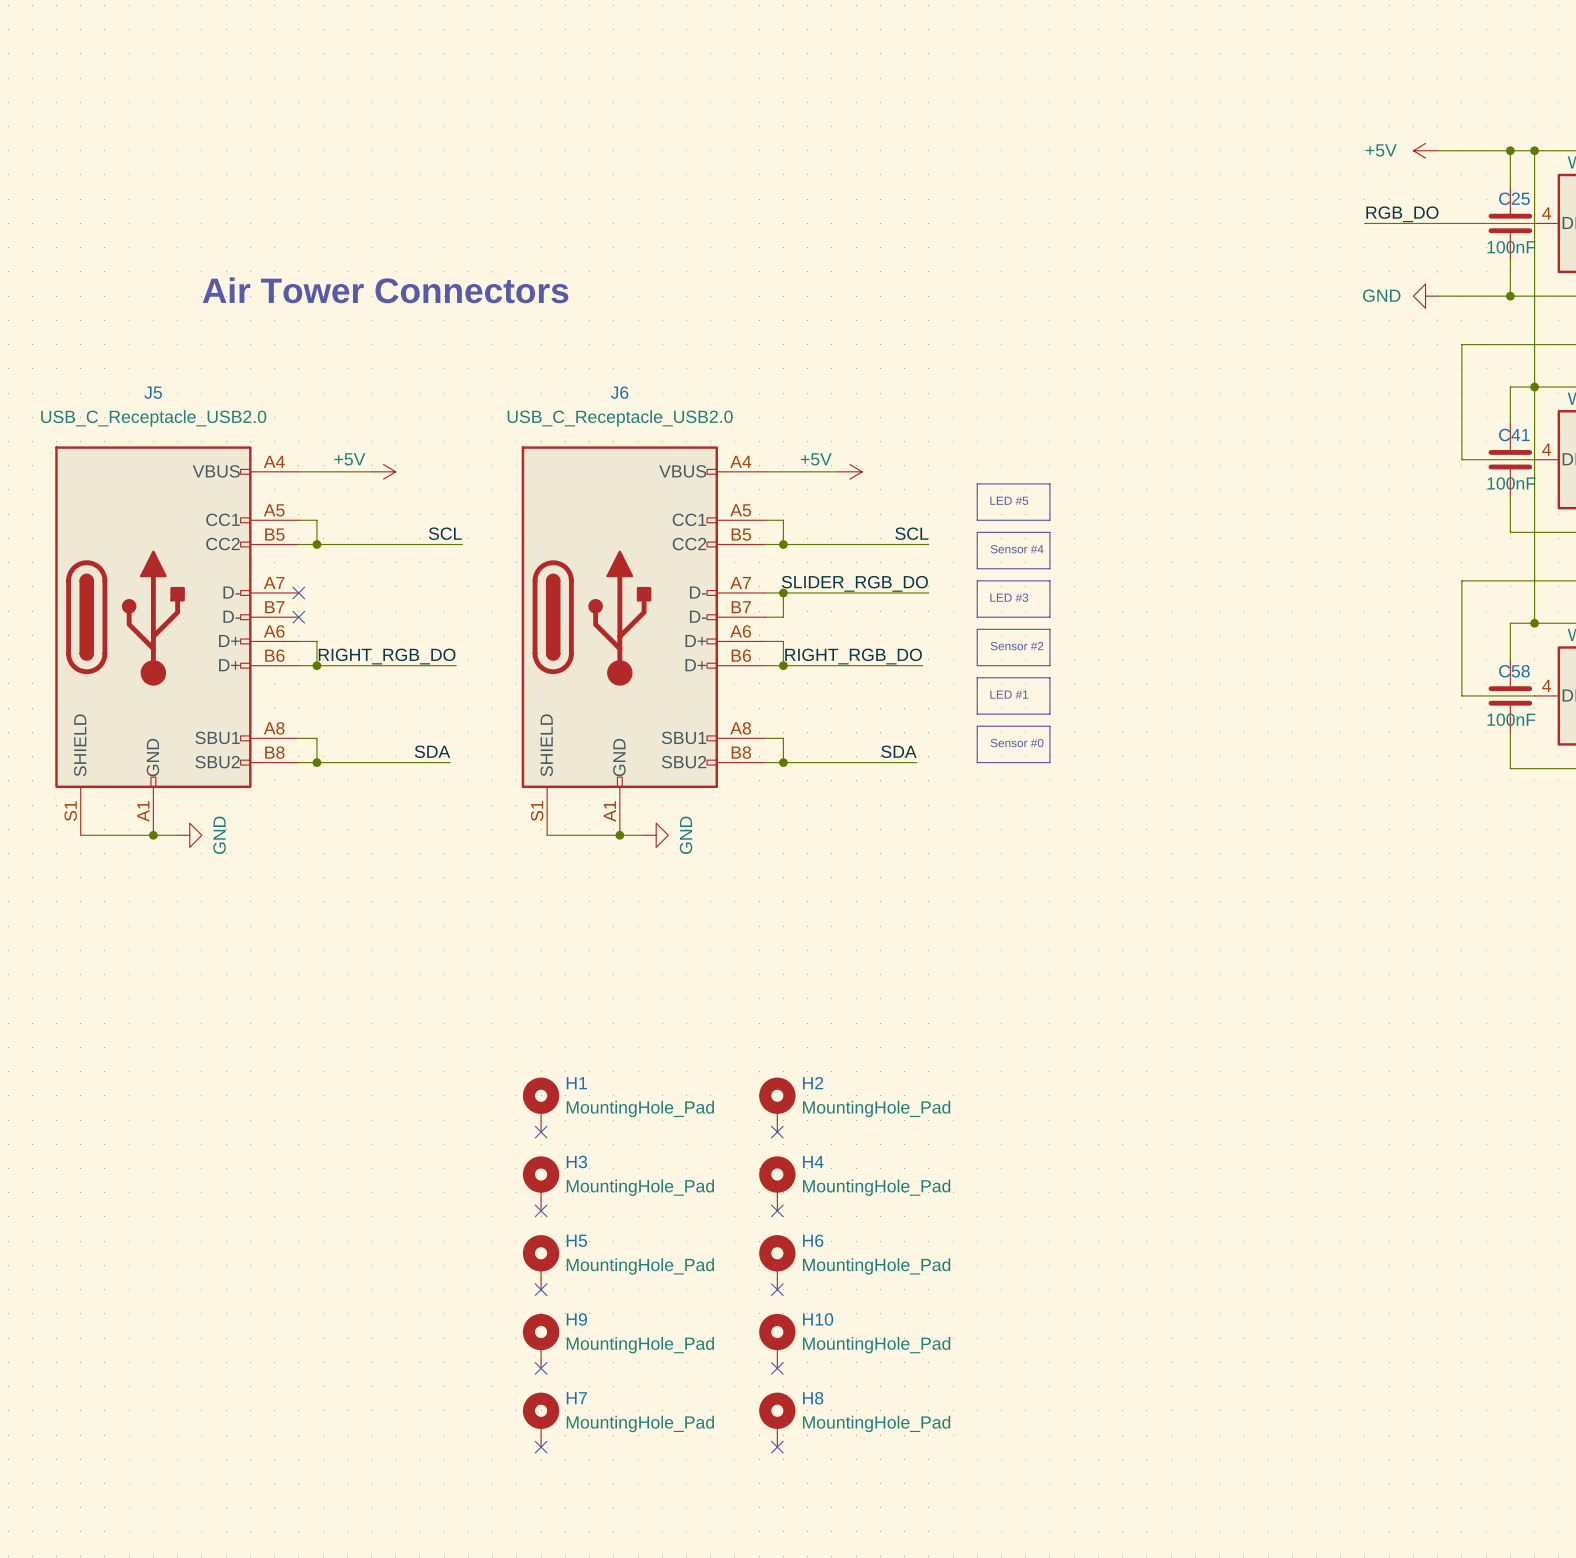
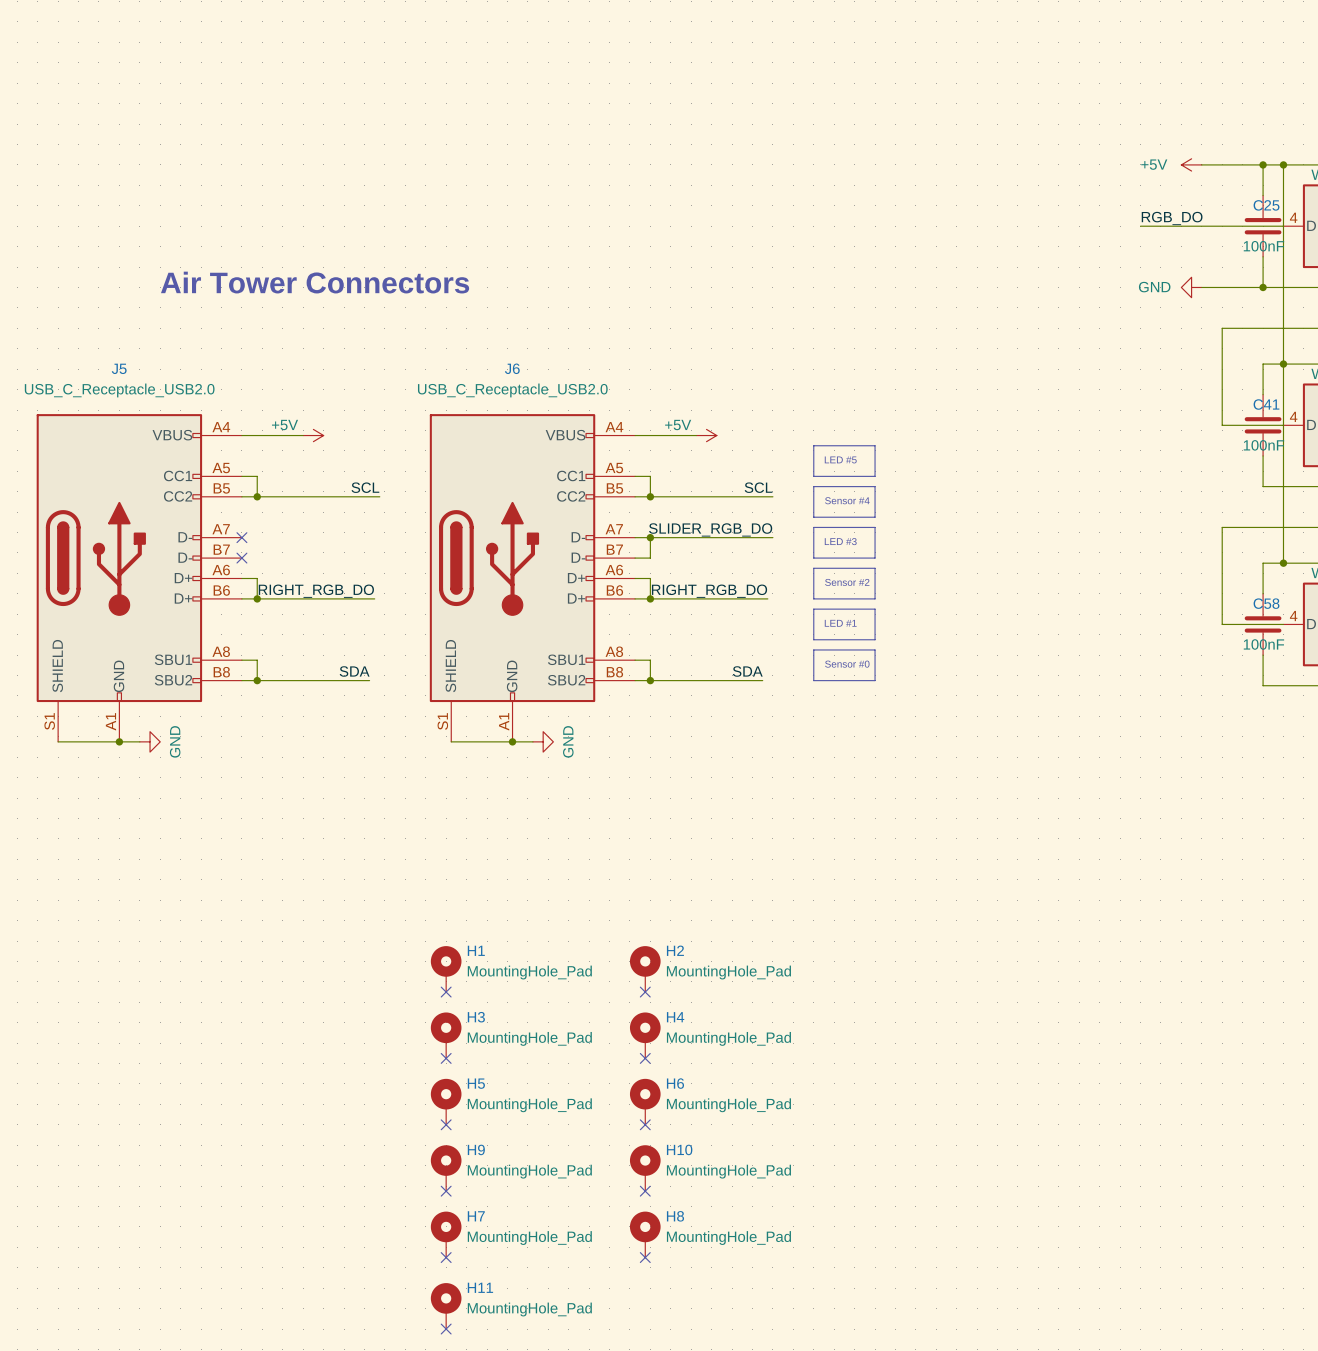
H11: none -> MountingHole_Pad (446, 1306)
no-connect mark: none -> (446, 1329)

